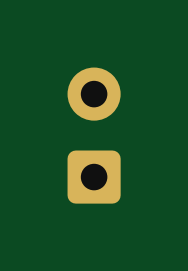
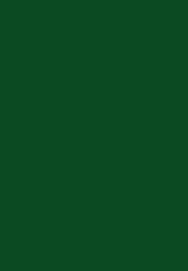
part: (94, 135) -> none

